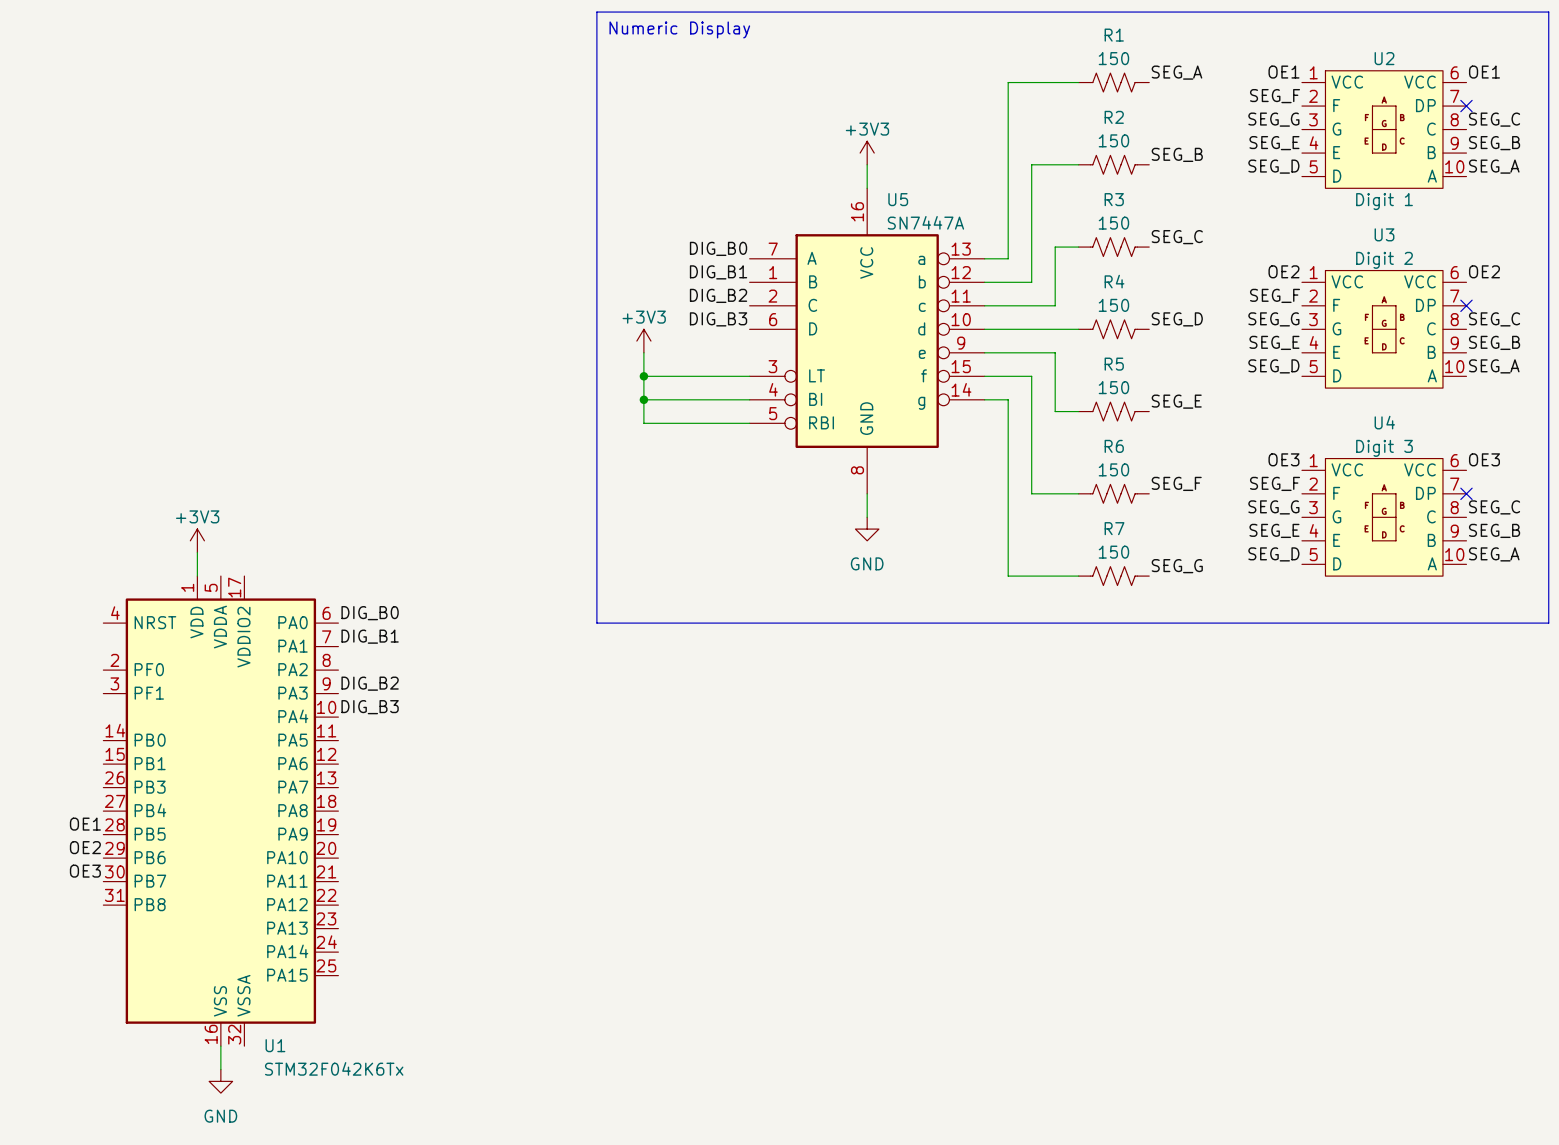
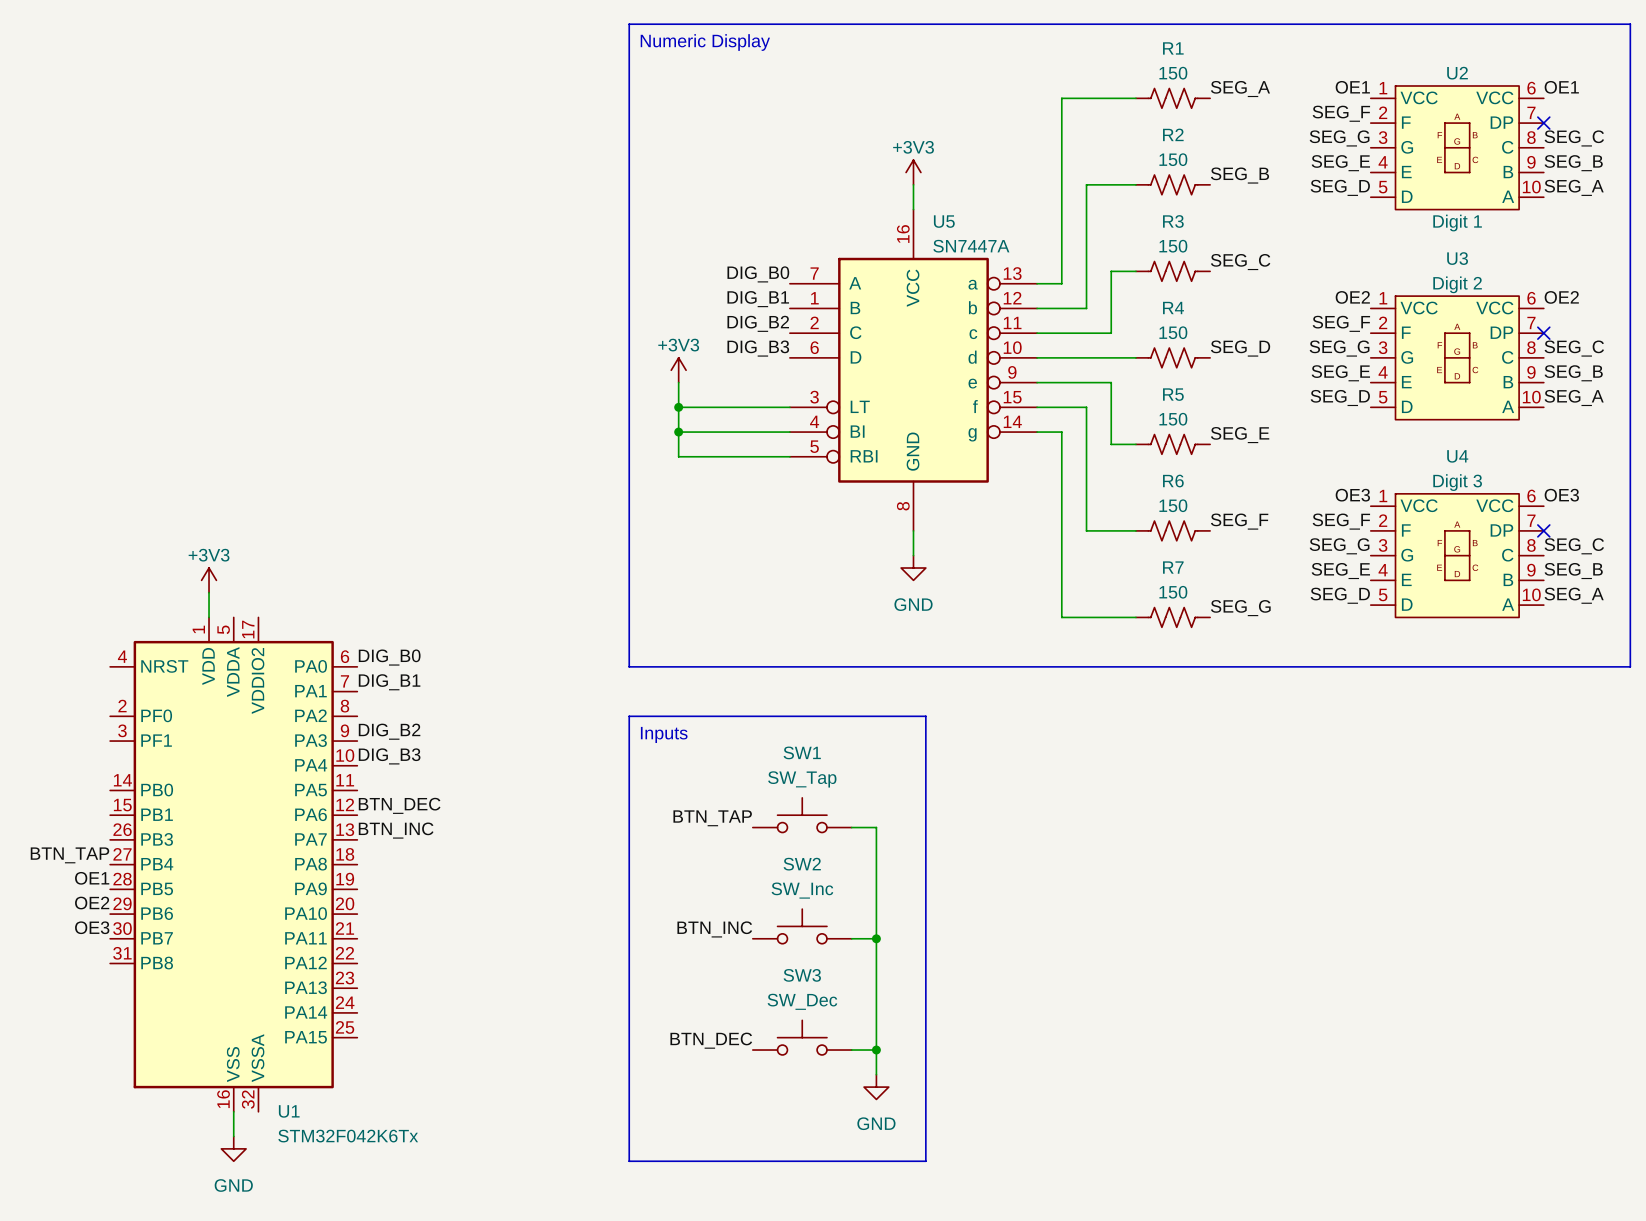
line: none -> (629, 716) (925, 716) (925, 1161) (629, 1161) (629, 716)
text: none -> Inputs (664, 734)
label: none -> BTN_DEC (399, 805)
SW1: none -> SW_Tap (802, 815)
label: none -> BTN_TAP (712, 818)
wire: none -> (851, 827) (876, 827) (876, 1074)
label: none -> BTN_INC (396, 830)
label: none -> BTN_TAP (69, 855)
SW2: none -> SW_Inc (802, 926)
label: none -> BTN_INC (714, 929)
wire: none -> (851, 938) (876, 938)
junction: none -> (876, 938)
SW3: none -> SW_Dec (802, 1037)
label: none -> BTN_DEC (711, 1040)
wire: none -> (851, 1050) (876, 1050)
junction: none -> (876, 1050)
power symbol: none -> GND (876, 1087)

